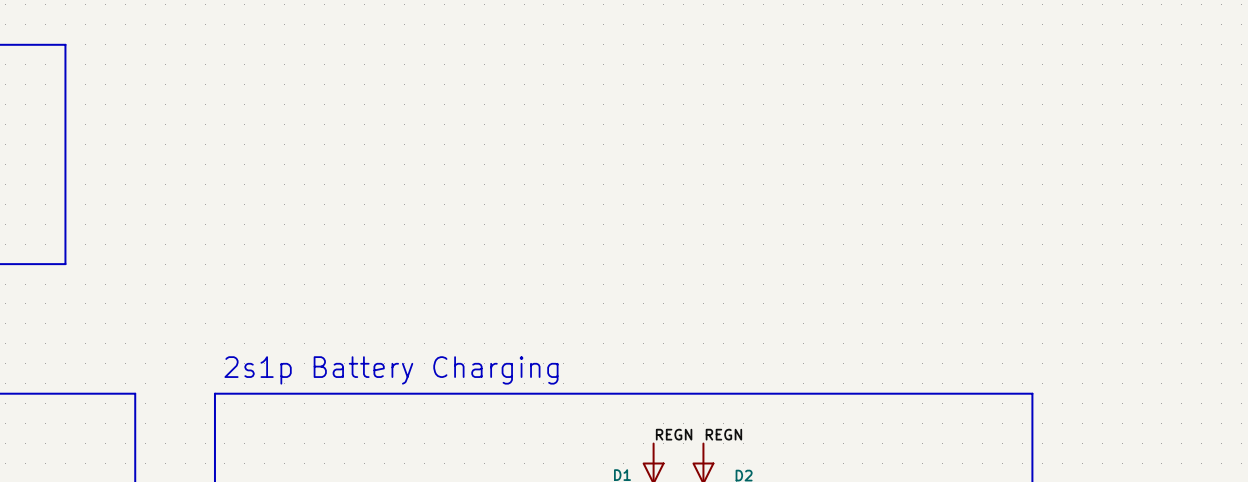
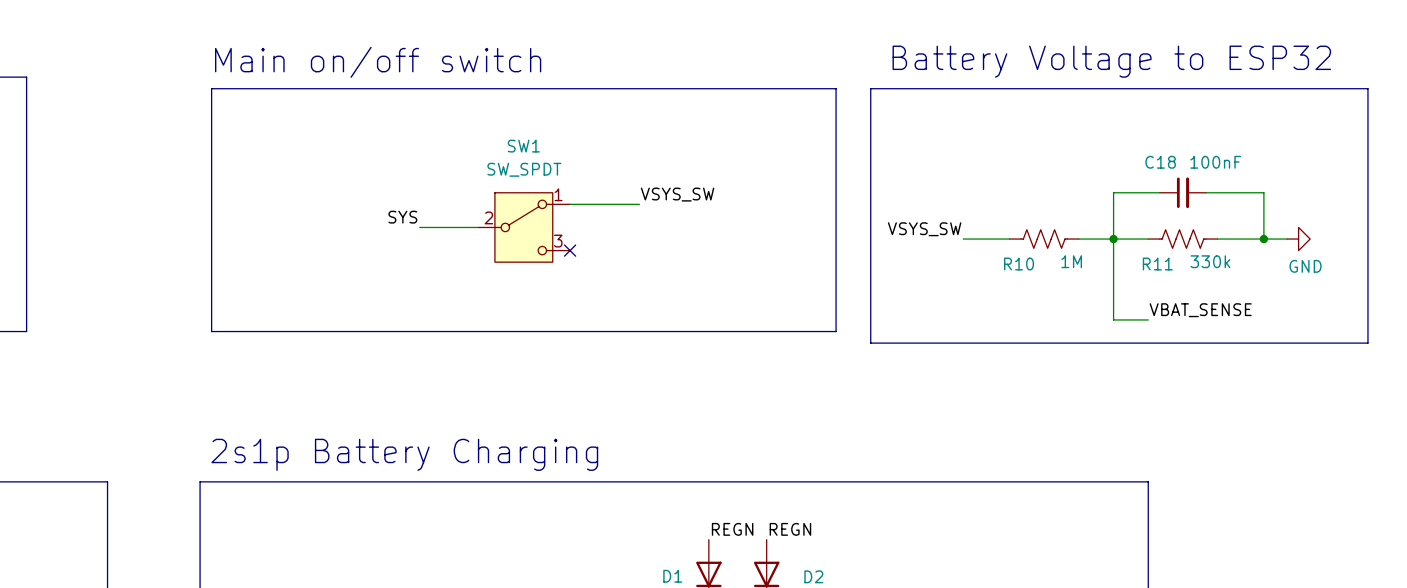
text: none -> Battery Voltage to ESP32 (1111, 61)
text: none -> Main on/off switch (378, 62)
line: none -> (211, 88) (836, 88) (836, 331) (211, 331) (211, 88)
line: none -> (870, 88) (1367, 88) (1367, 343) (870, 343) (870, 88)
wire: none -> (1159, 192) (1113, 192) (1113, 319) (1148, 319)
C18: none -> 100nF (1182, 192)
wire: none -> (1206, 192) (1263, 192) (1263, 239)
label: none -> VSYS_SW (677, 194)
wire: none -> (570, 204) (639, 204)
label: none -> SYS (402, 217)
wire: none -> (419, 227) (477, 227)
SW1: none -> SW_SPDT (523, 227)
label: none -> VSYS_SW (924, 229)
wire: none -> (963, 239) (1009, 239)
R10: none -> 1M (1044, 239)
wire: none -> (1078, 239) (1148, 239)
junction: none -> (1113, 239)
R11: none -> 330k (1182, 239)
wire: none -> (1217, 239) (1287, 239)
junction: none -> (1263, 239)
power symbol: none -> GND (1298, 239)
no-connect mark: none -> (570, 250)
label: none -> VBAT_SENSE (1200, 310)

